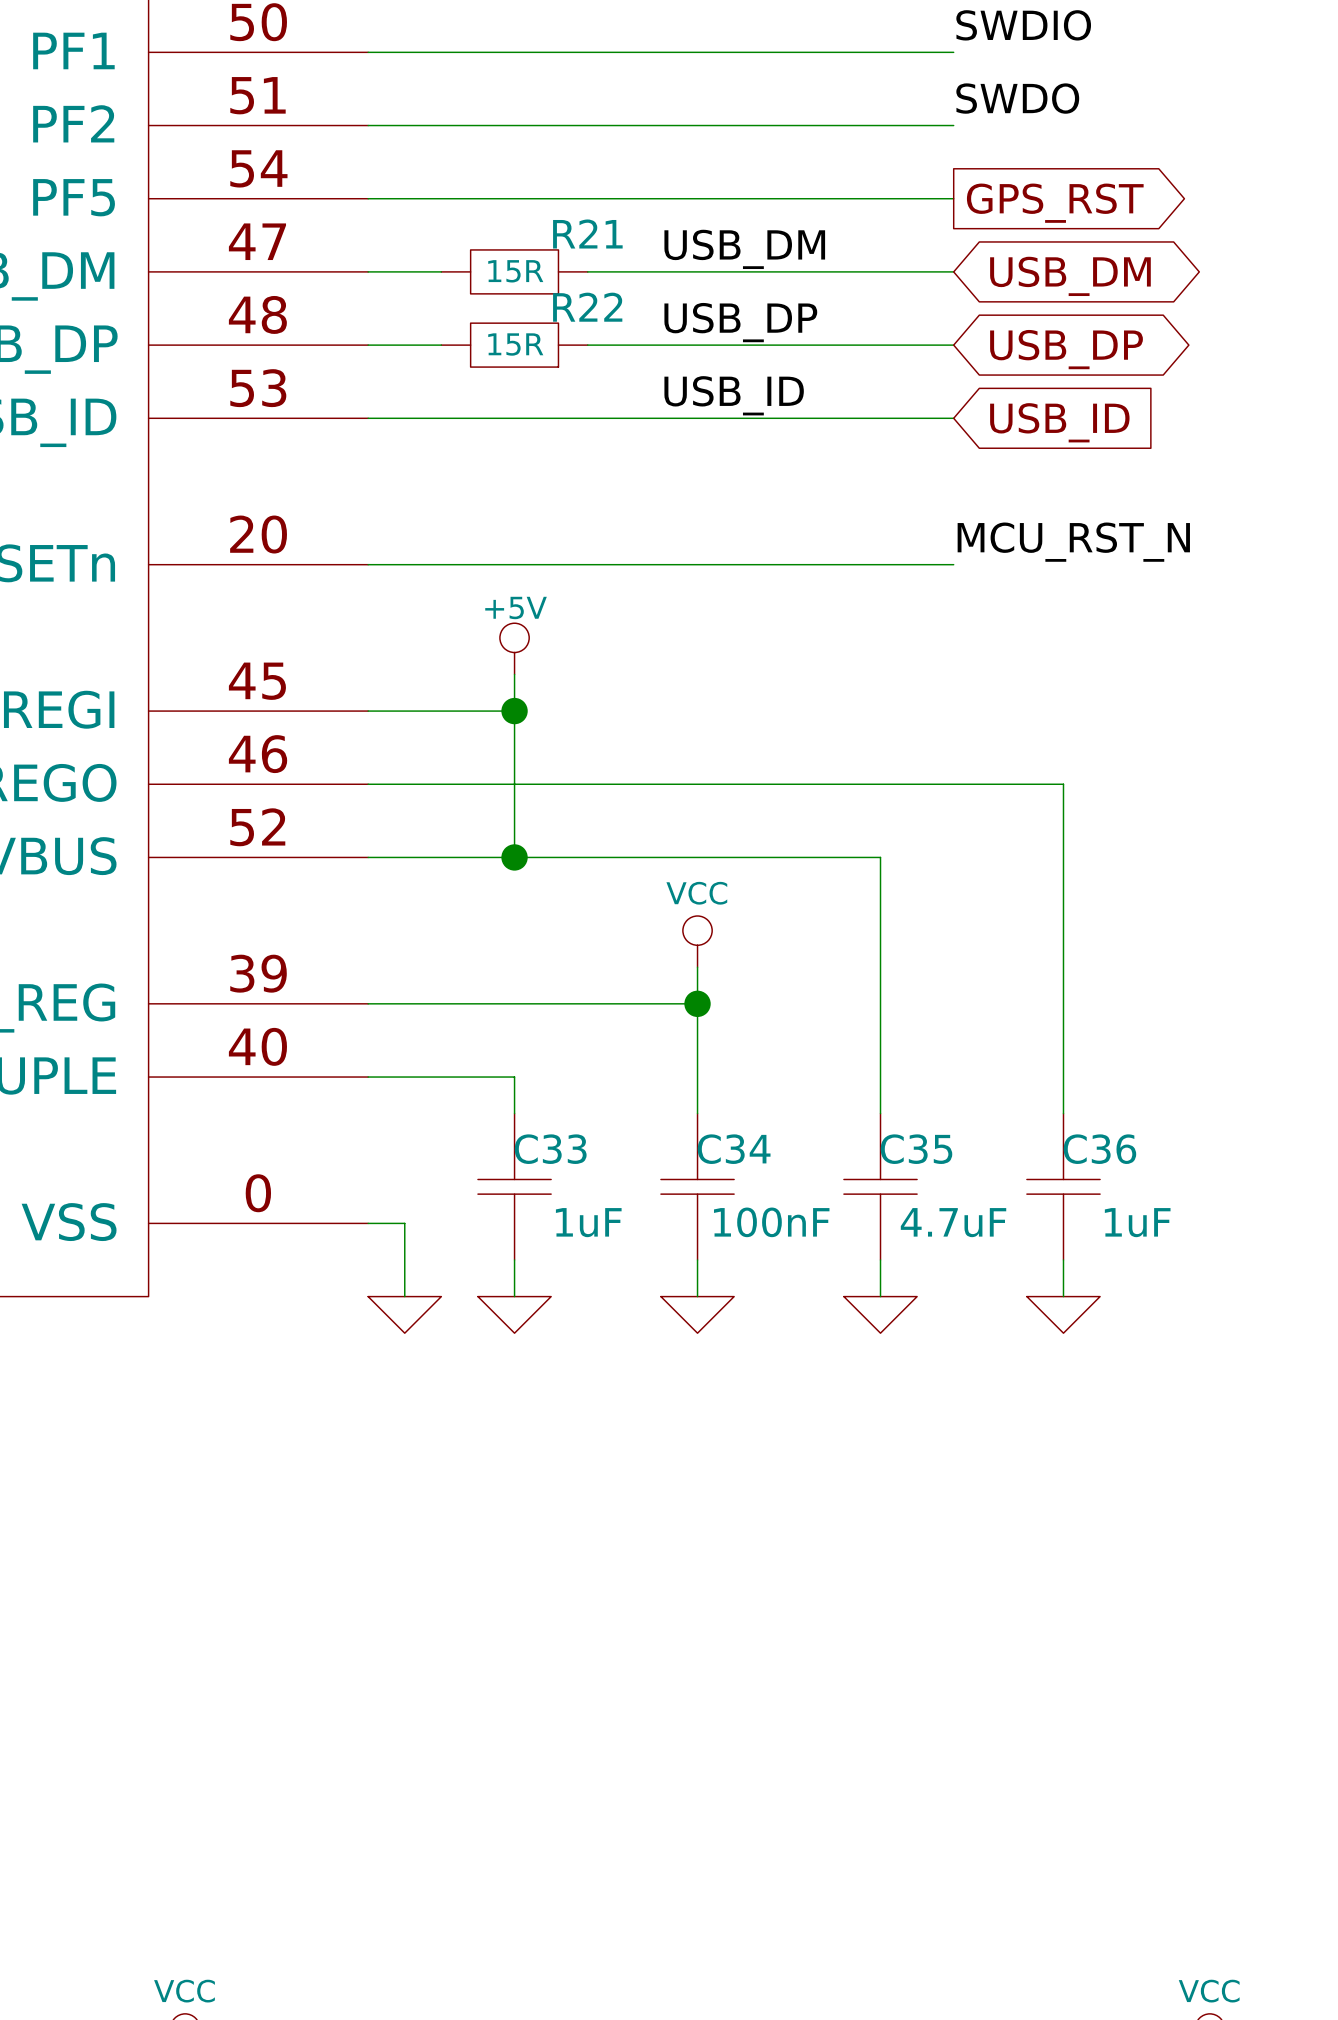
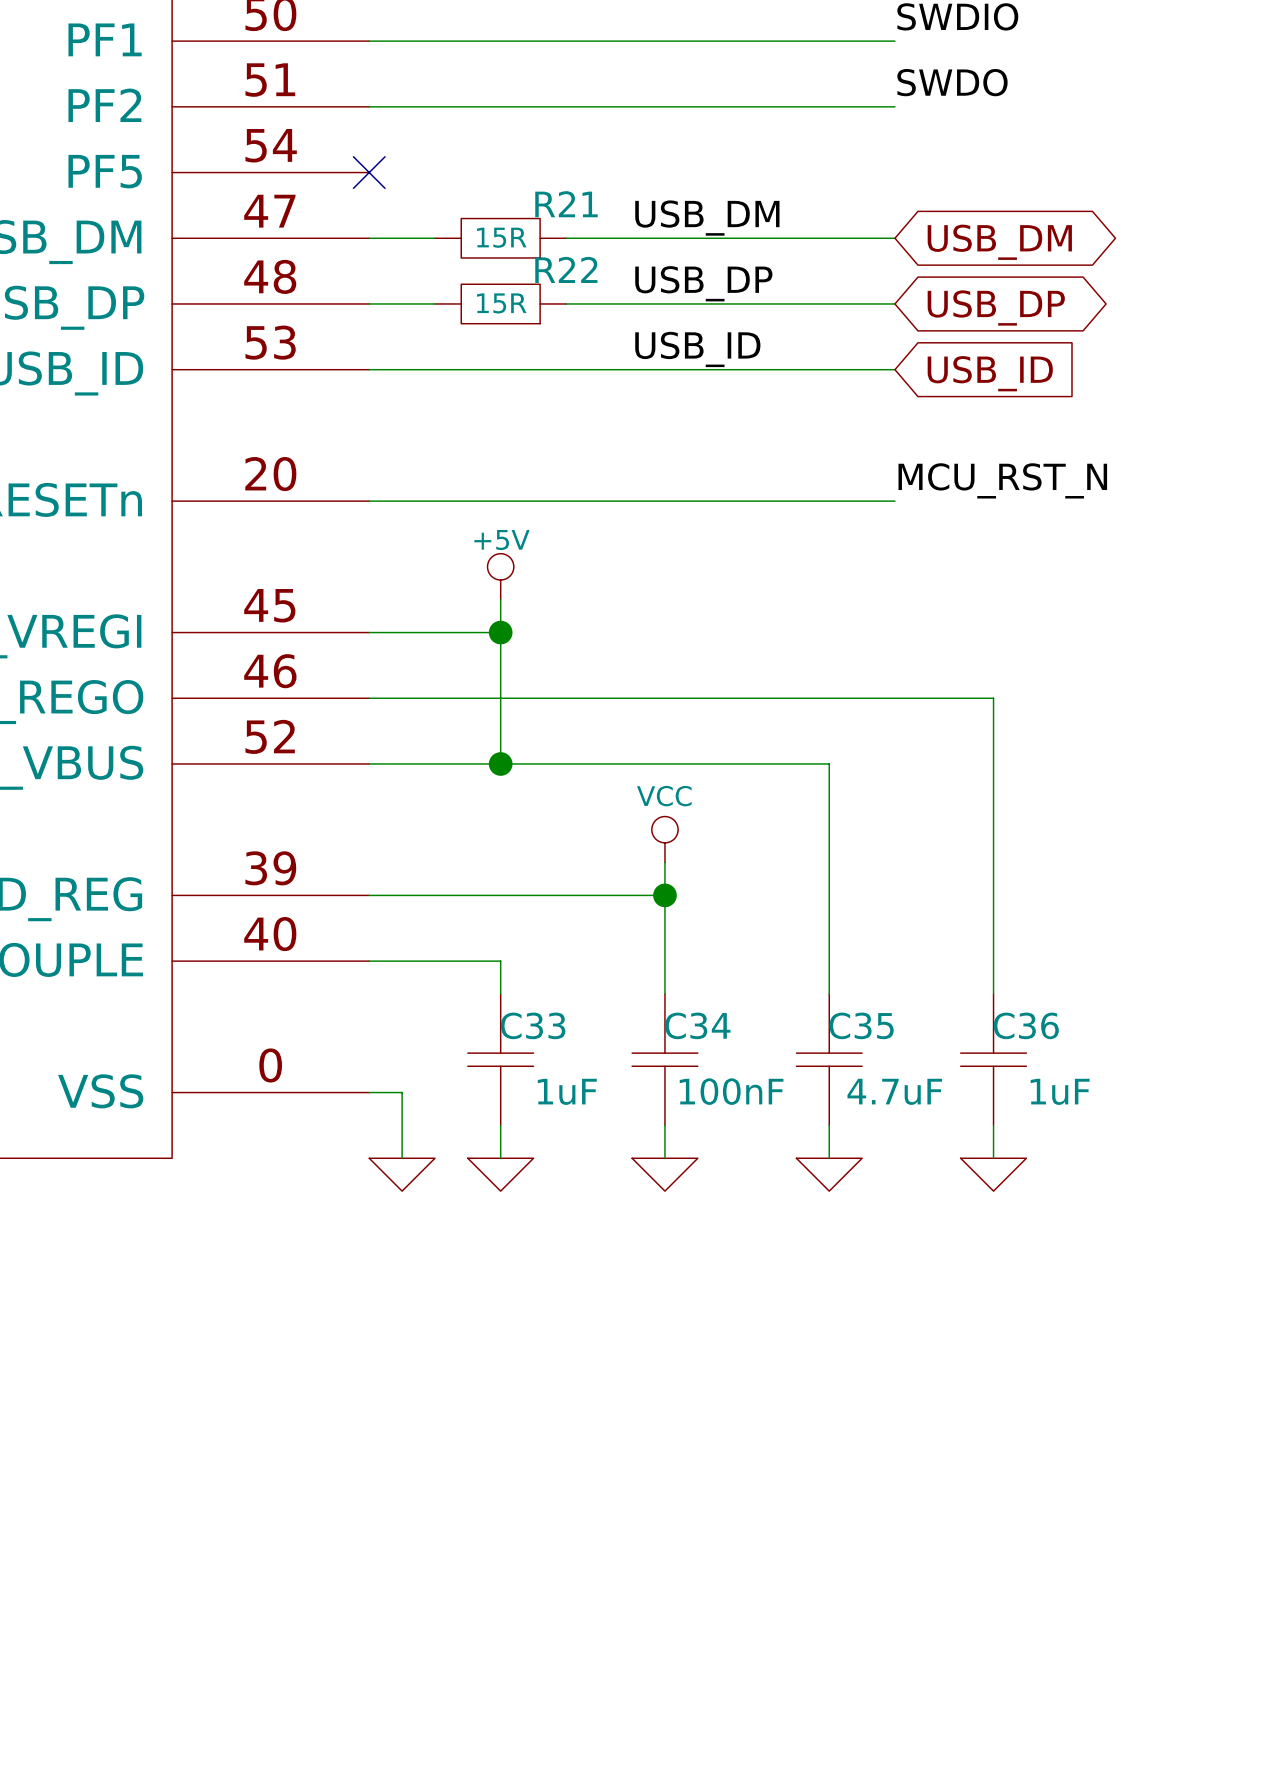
wire: (368, 198) (953, 198) -> none
no-connect mark: none -> (369, 172)
global label: GPS_RST (1055, 203) -> none

